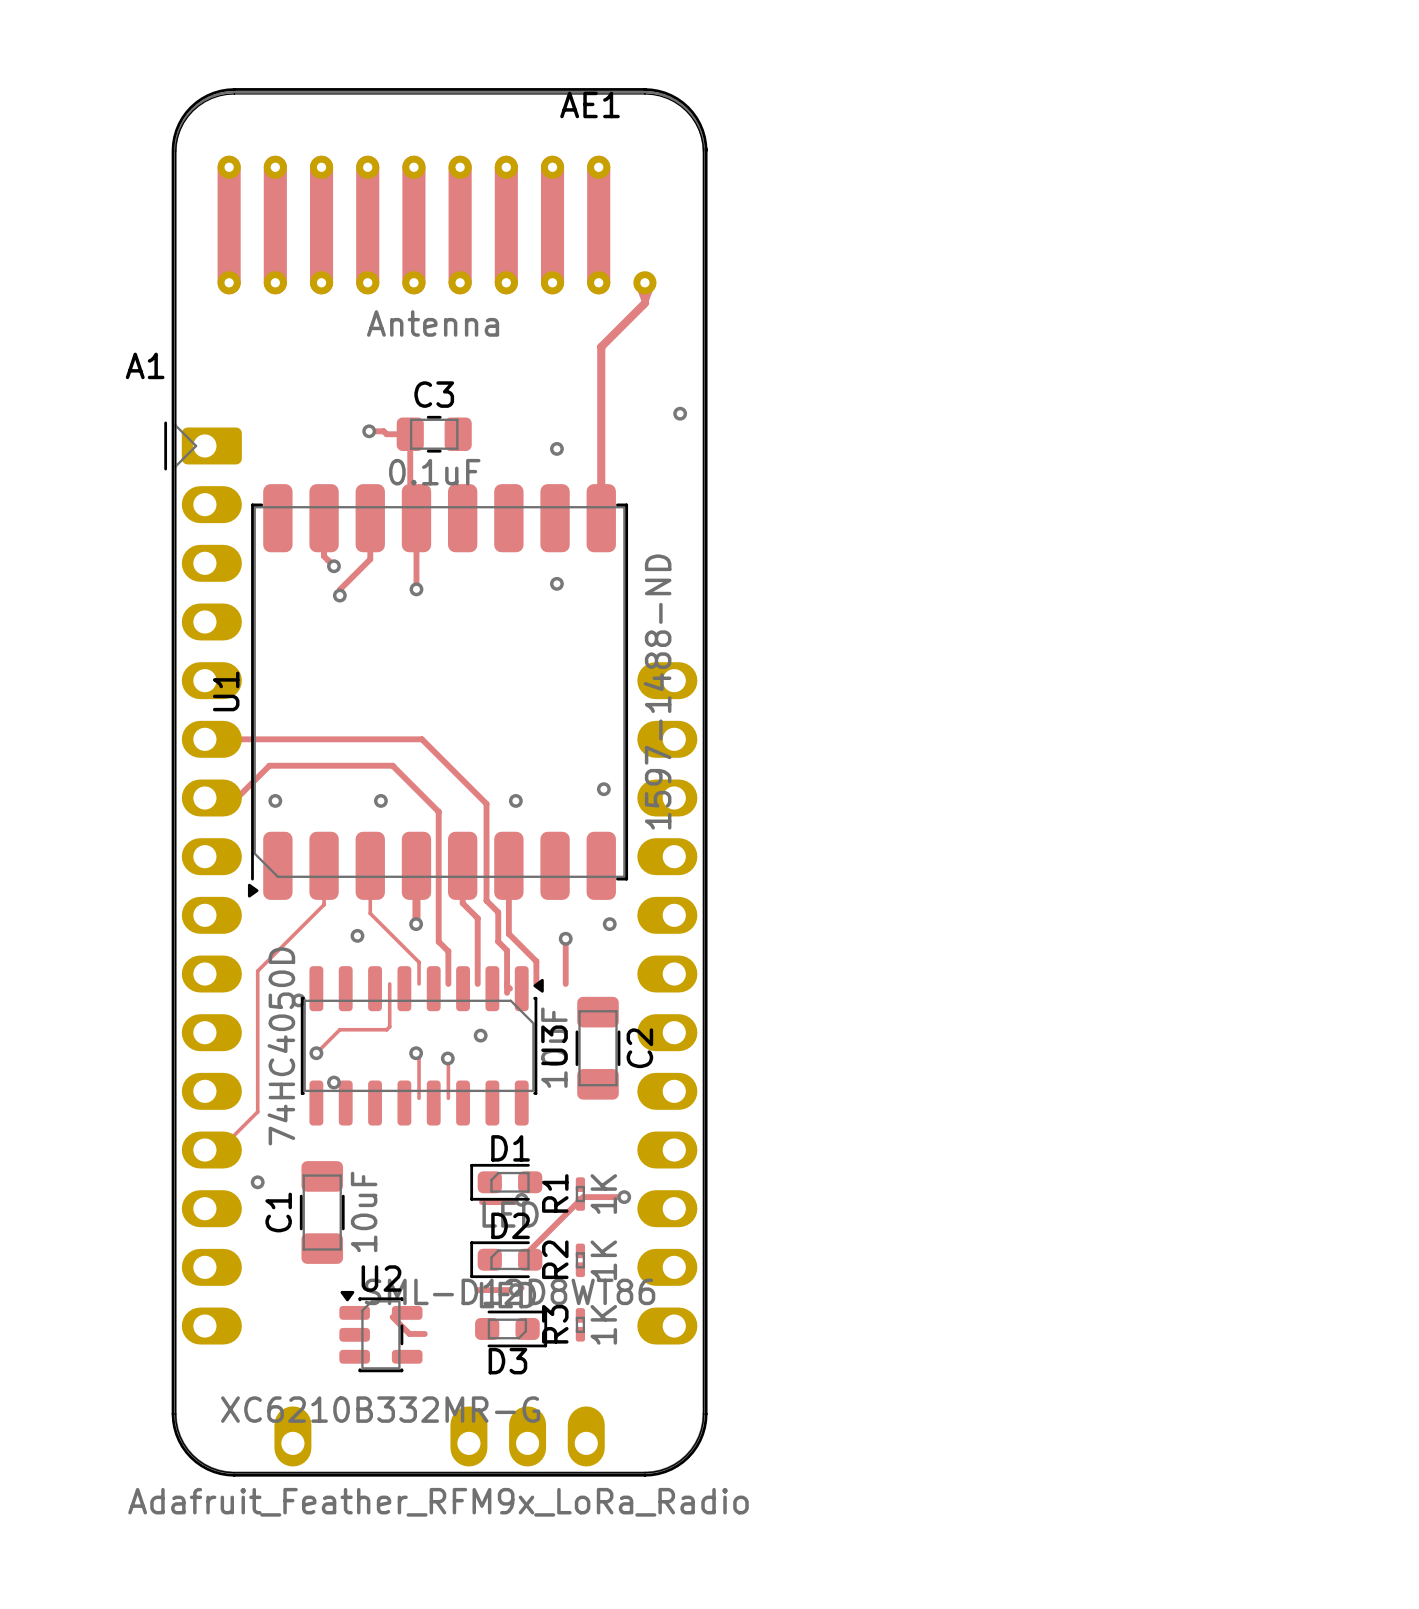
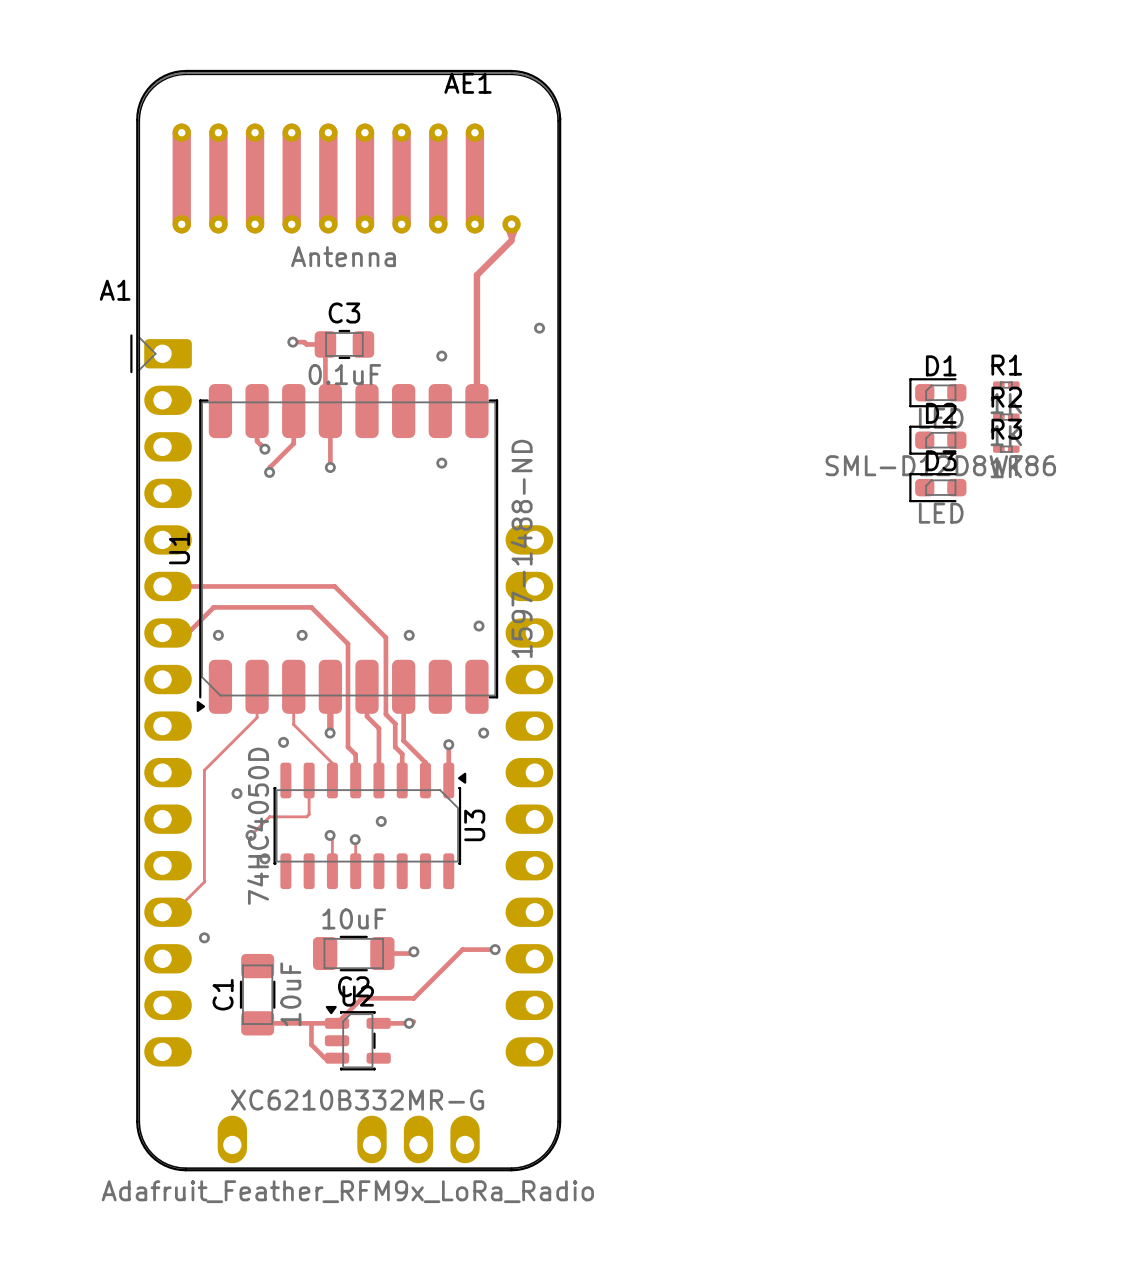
U3 position: (422, 1045) -> (369, 825)
C2 rotation: 0° (598, 1048) -> 90° clockwise (353, 953)
C2 position: (598, 1048) -> (353, 953)
D1 position: (506, 1182) -> (937, 392)
R1 rotation: 0° (580, 1194) -> 90° clockwise (1006, 385)
R1 position: (580, 1194) -> (1006, 385)
C1 position: (322, 1212) -> (257, 994)
track: none -> (413, 998) (361, 998) (336, 1023) (257, 1023)
D2 position: (506, 1259) -> (937, 440)
R2 rotation: 0° (580, 1260) -> 90° clockwise (1006, 417)
R2 position: (580, 1260) -> (1006, 417)
track: none -> (311, 1023) (311, 1044)
R3 rotation: 0° (580, 1324) -> 90° clockwise (1006, 449)
R3 position: (580, 1324) -> (1006, 449)
D3 rotation: 0° (511, 1328) -> 180° (937, 487)
D3 position: (511, 1328) -> (937, 487)
U2 position: (380, 1331) -> (357, 1038)

